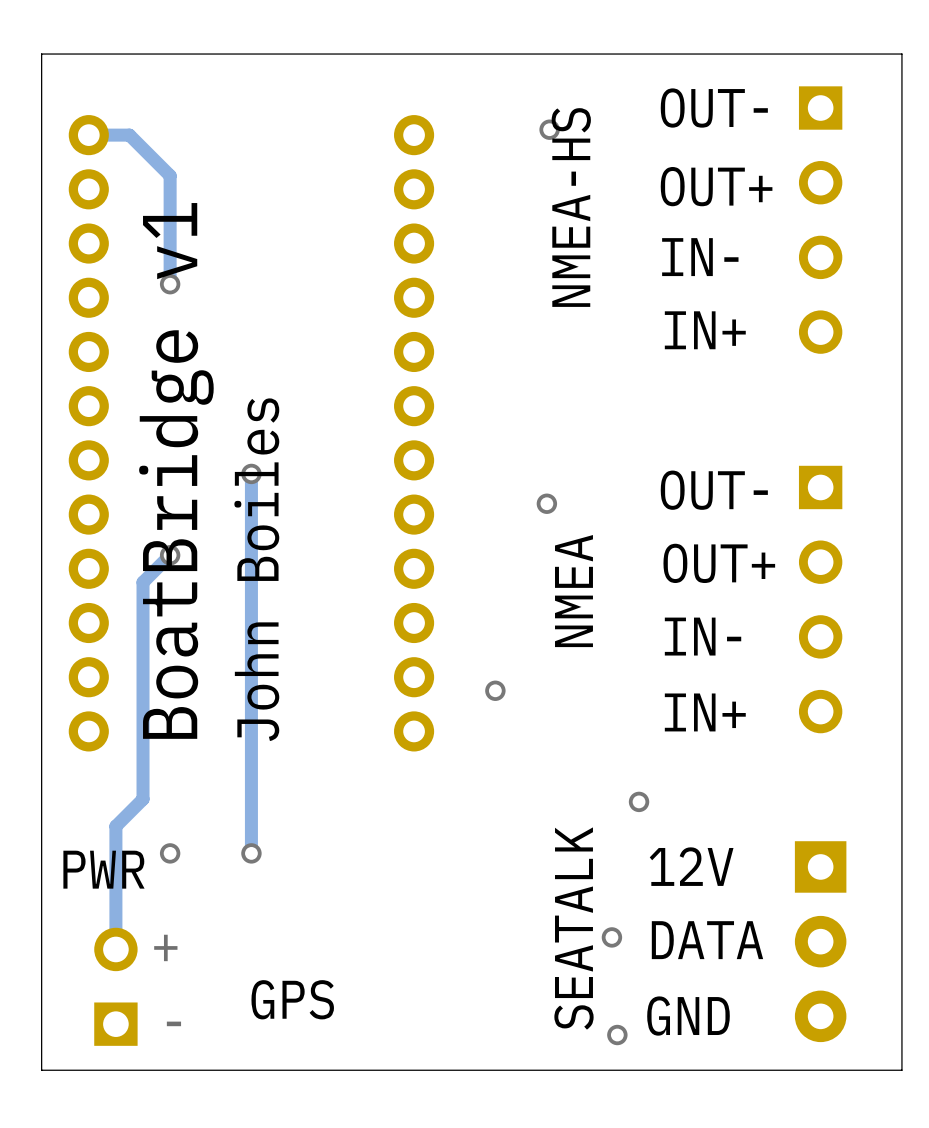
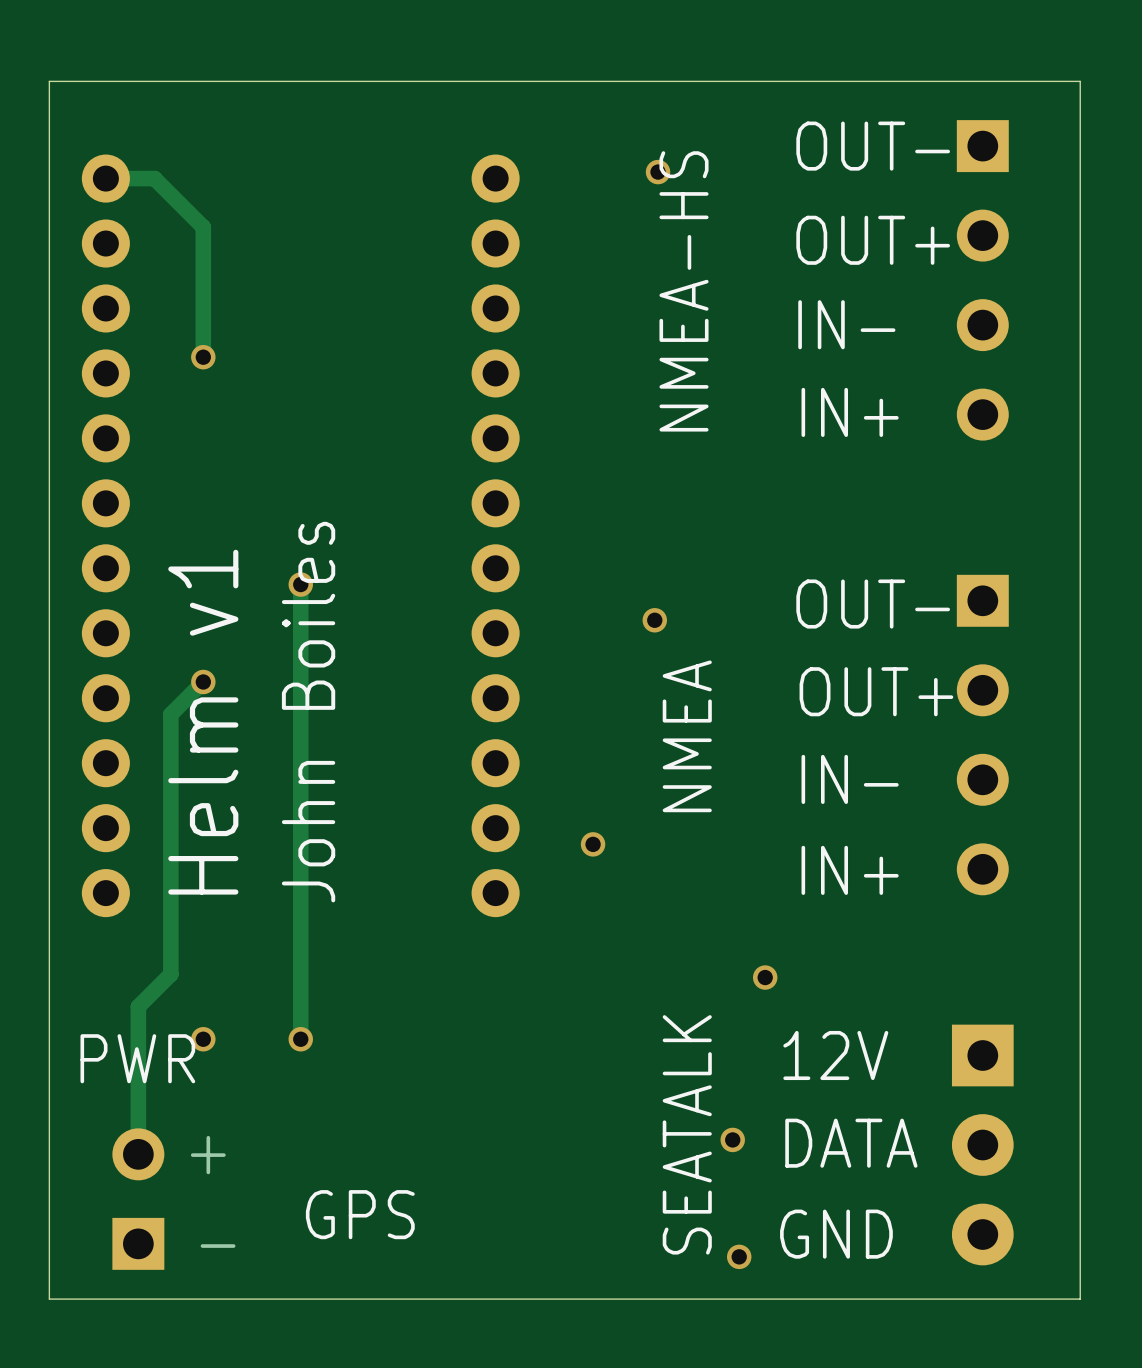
text: BoatBridge v1 (176, 470) -> Helm v1 (203, 722)

